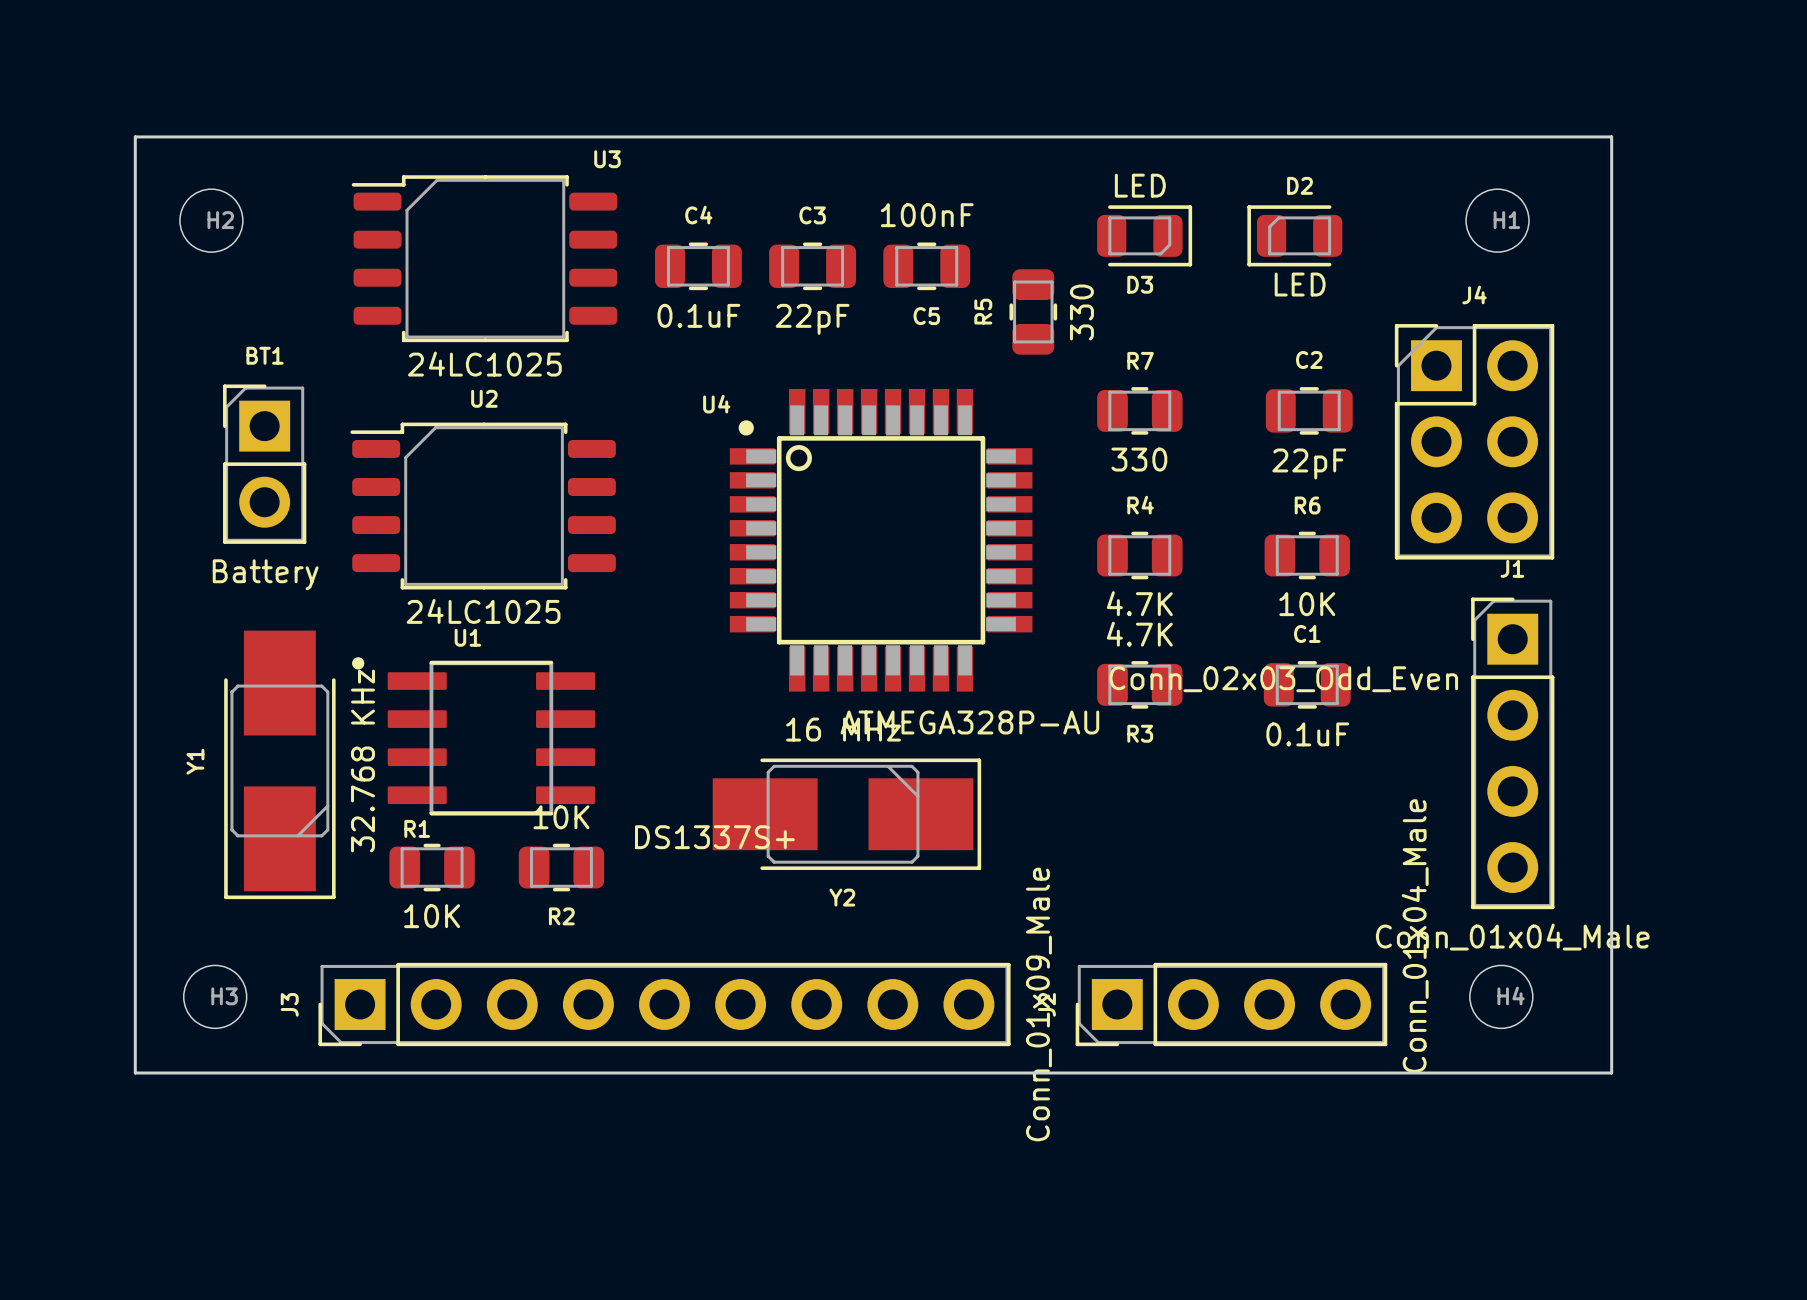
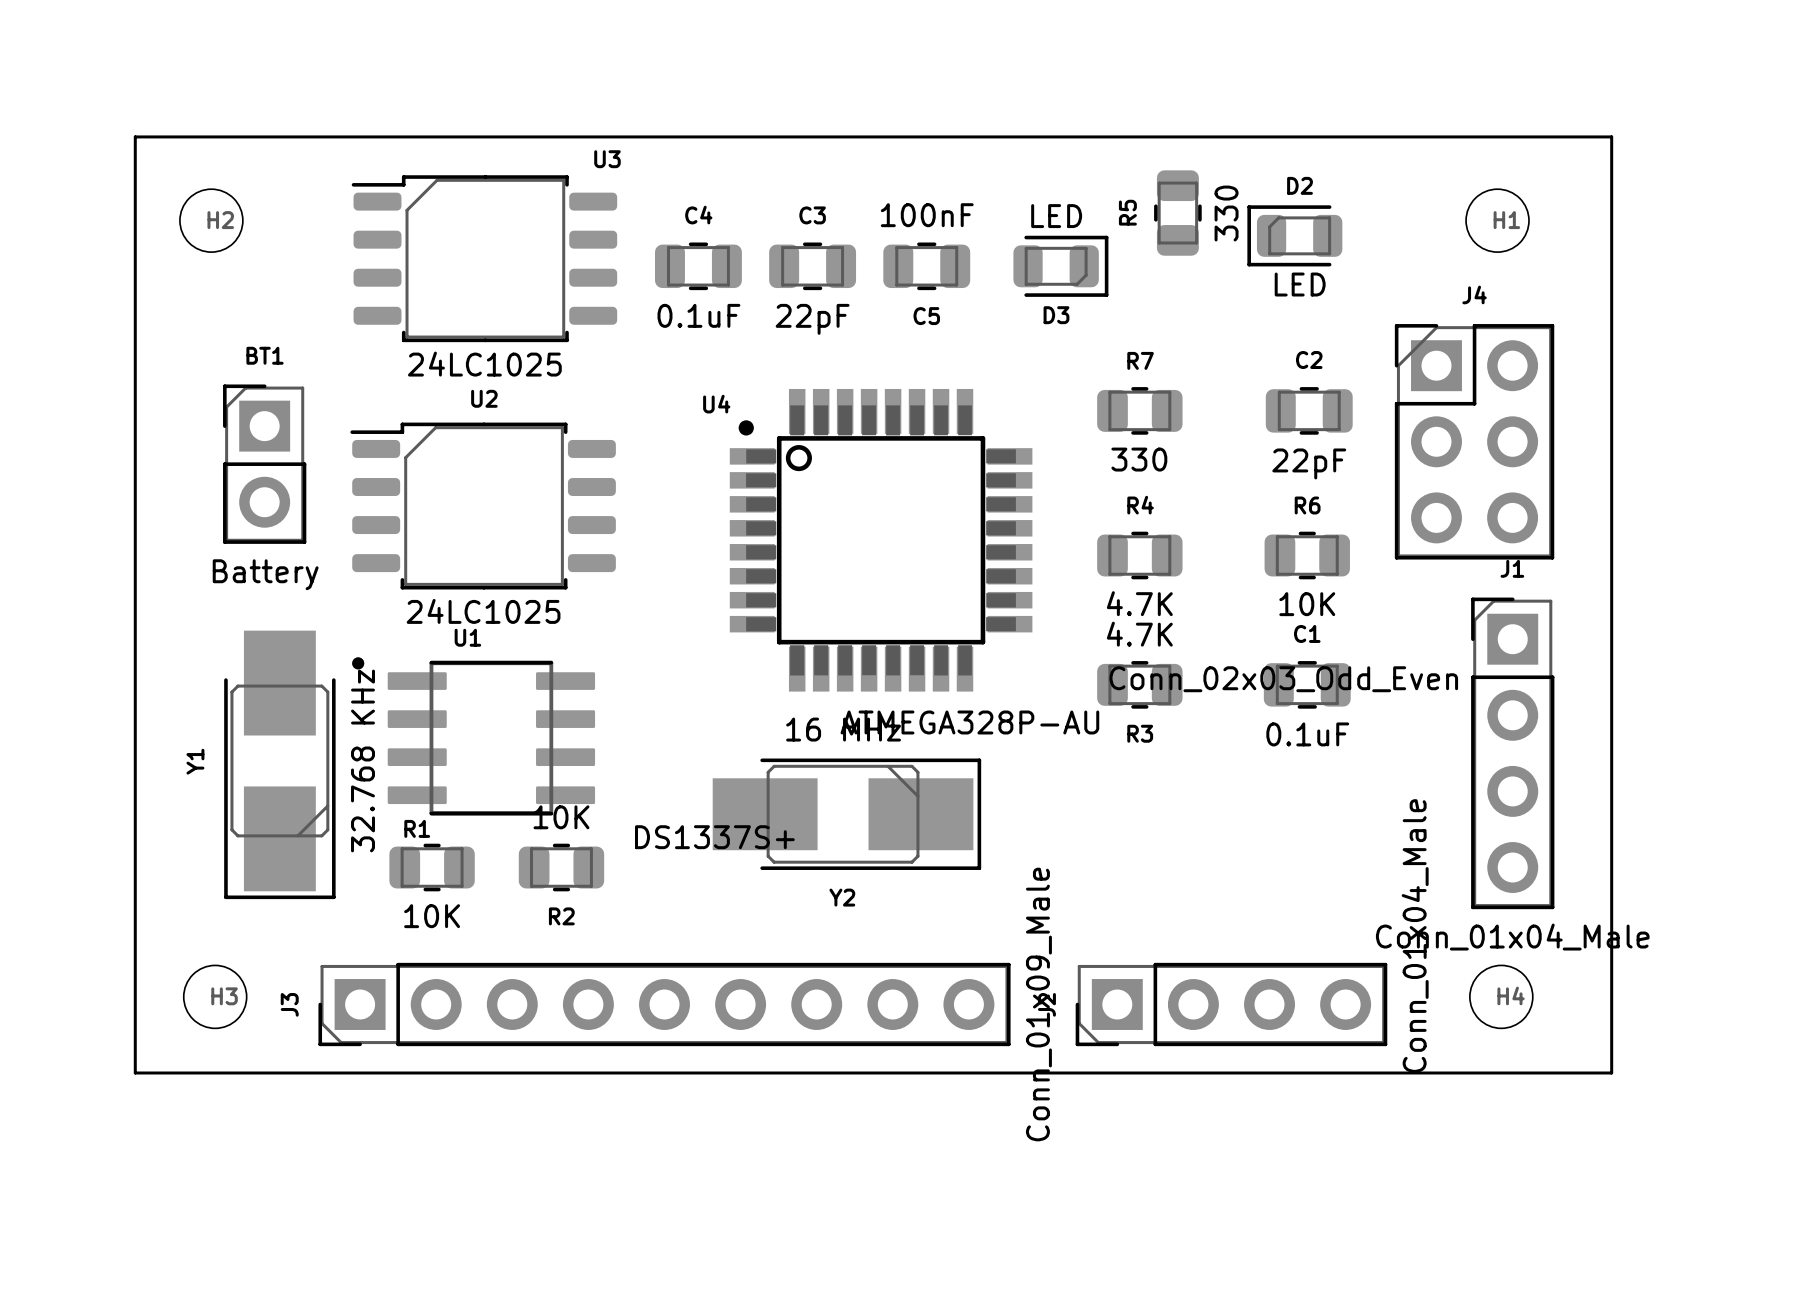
D3 position: (1144, 235) -> (1060, 266)
R5 position: (1033, 311) -> (1177, 213)

